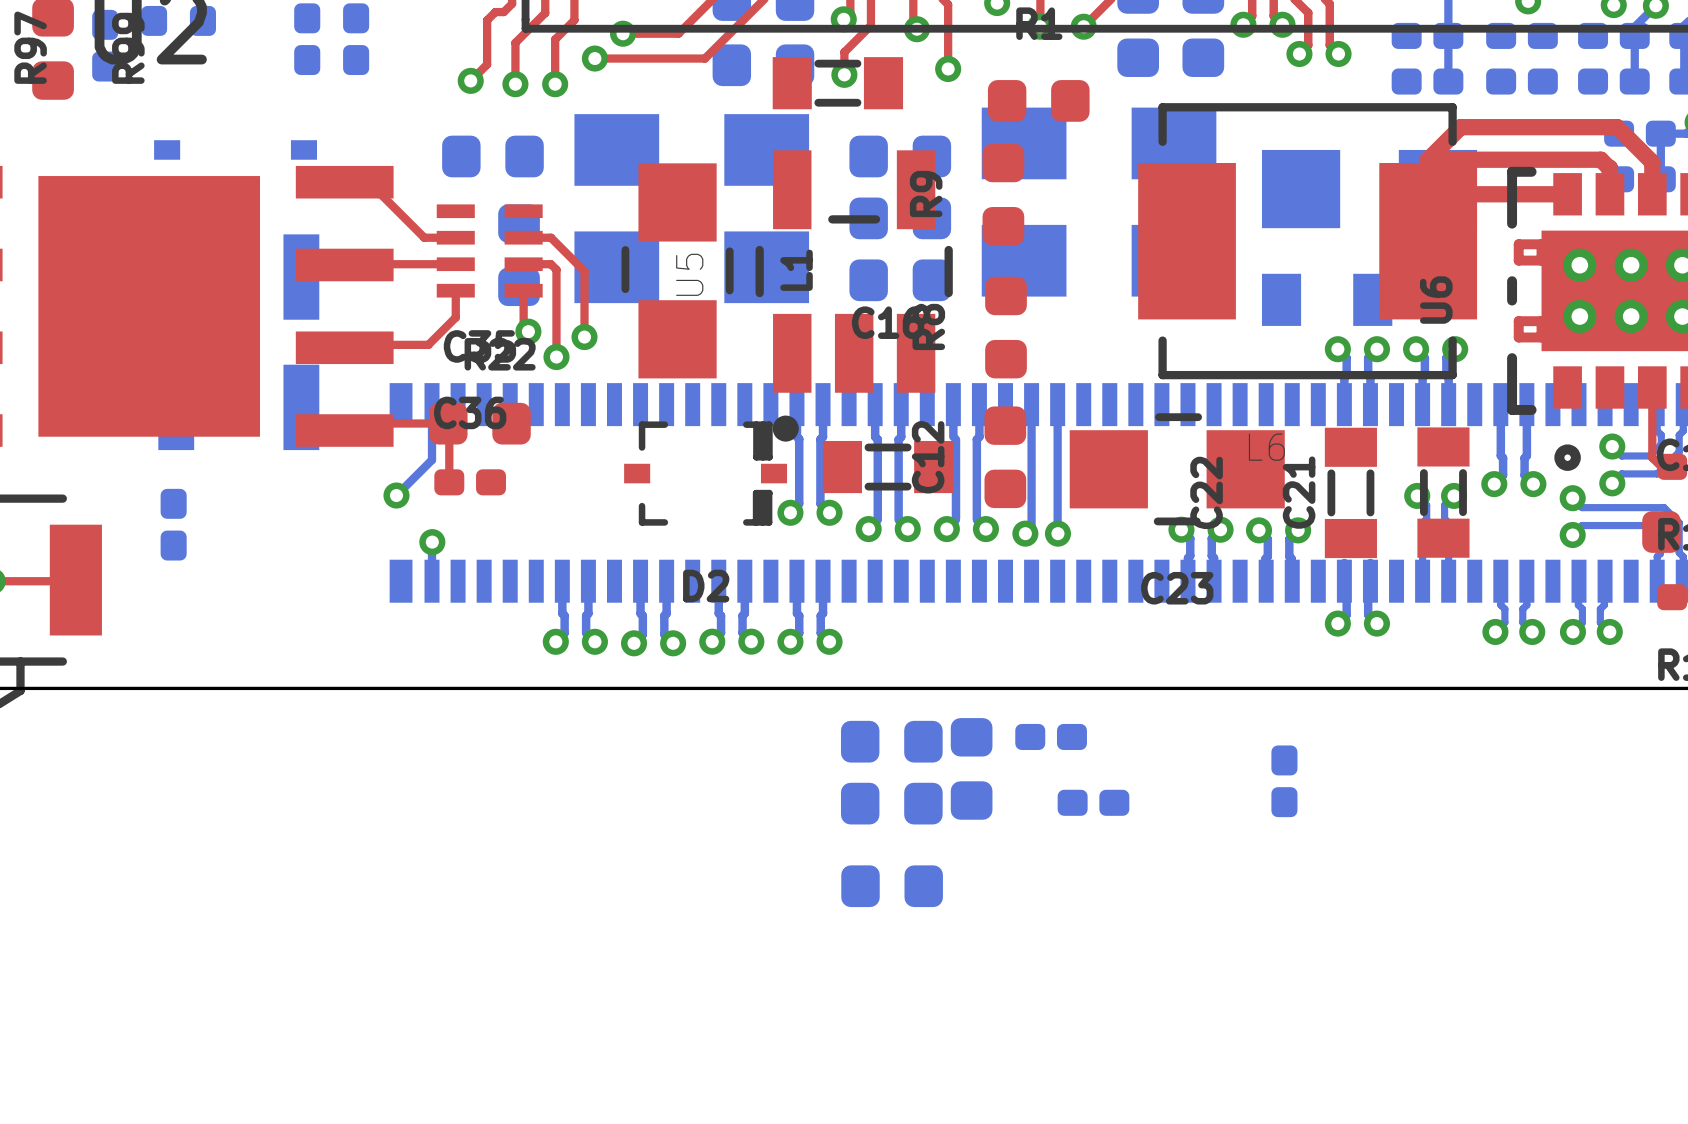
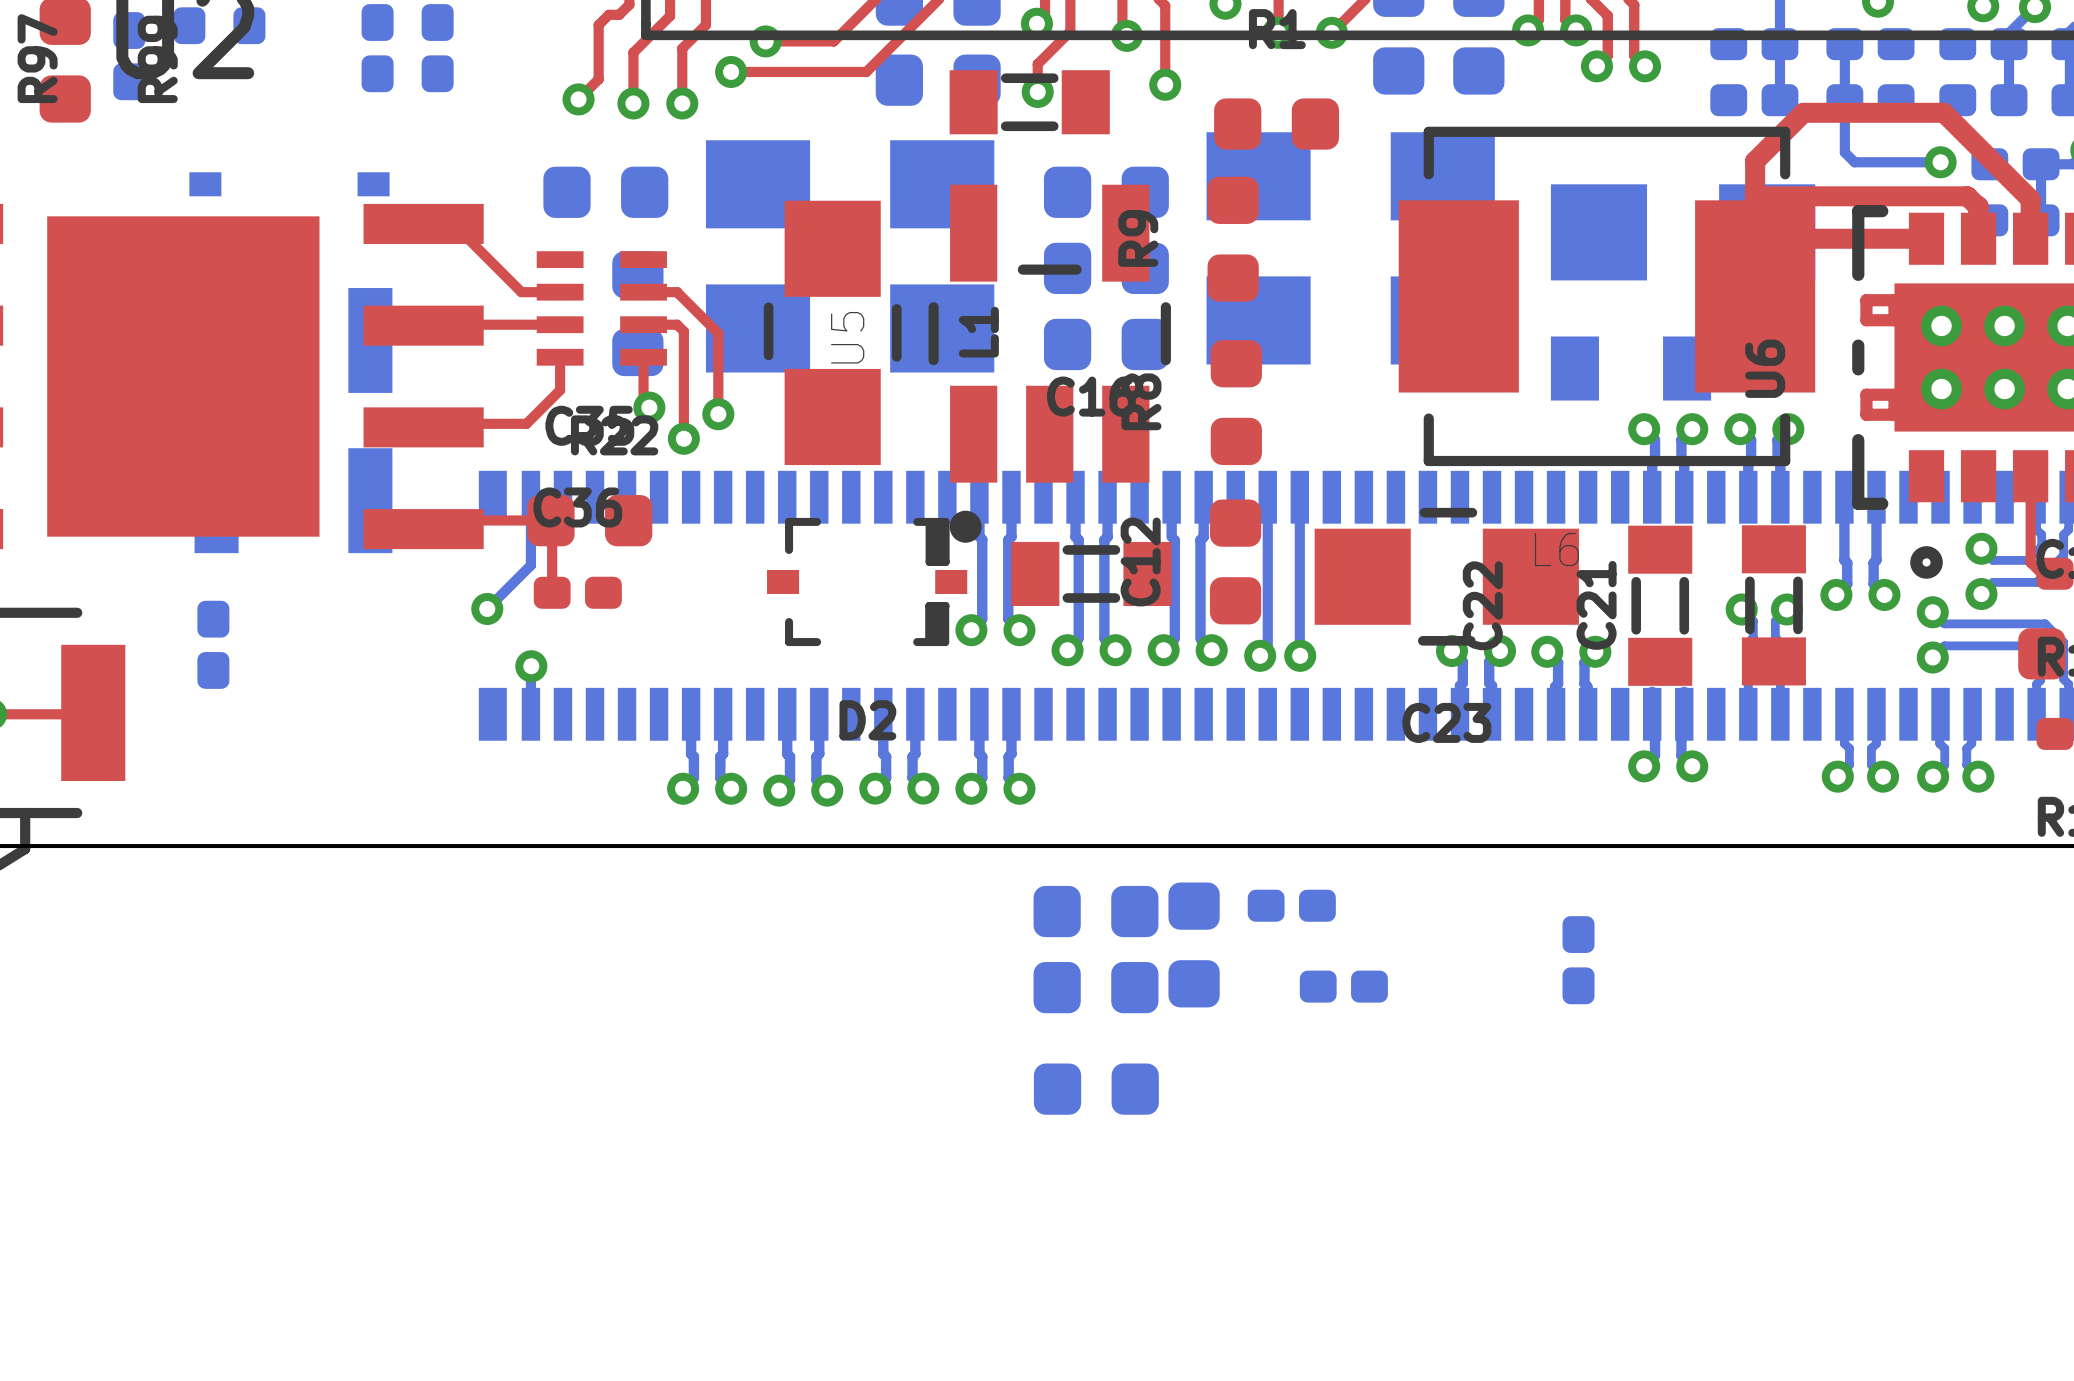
bottom track: none -> (1844, 44) (1844, 152) (1854, 162) (1940, 162)
top track: (1617, 127) (1460, 127) (1428, 159) -> (1987, 156) (1943, 112) (1803, 112) (1755, 161) (1755, 196)
via: none -> (1940, 162)

